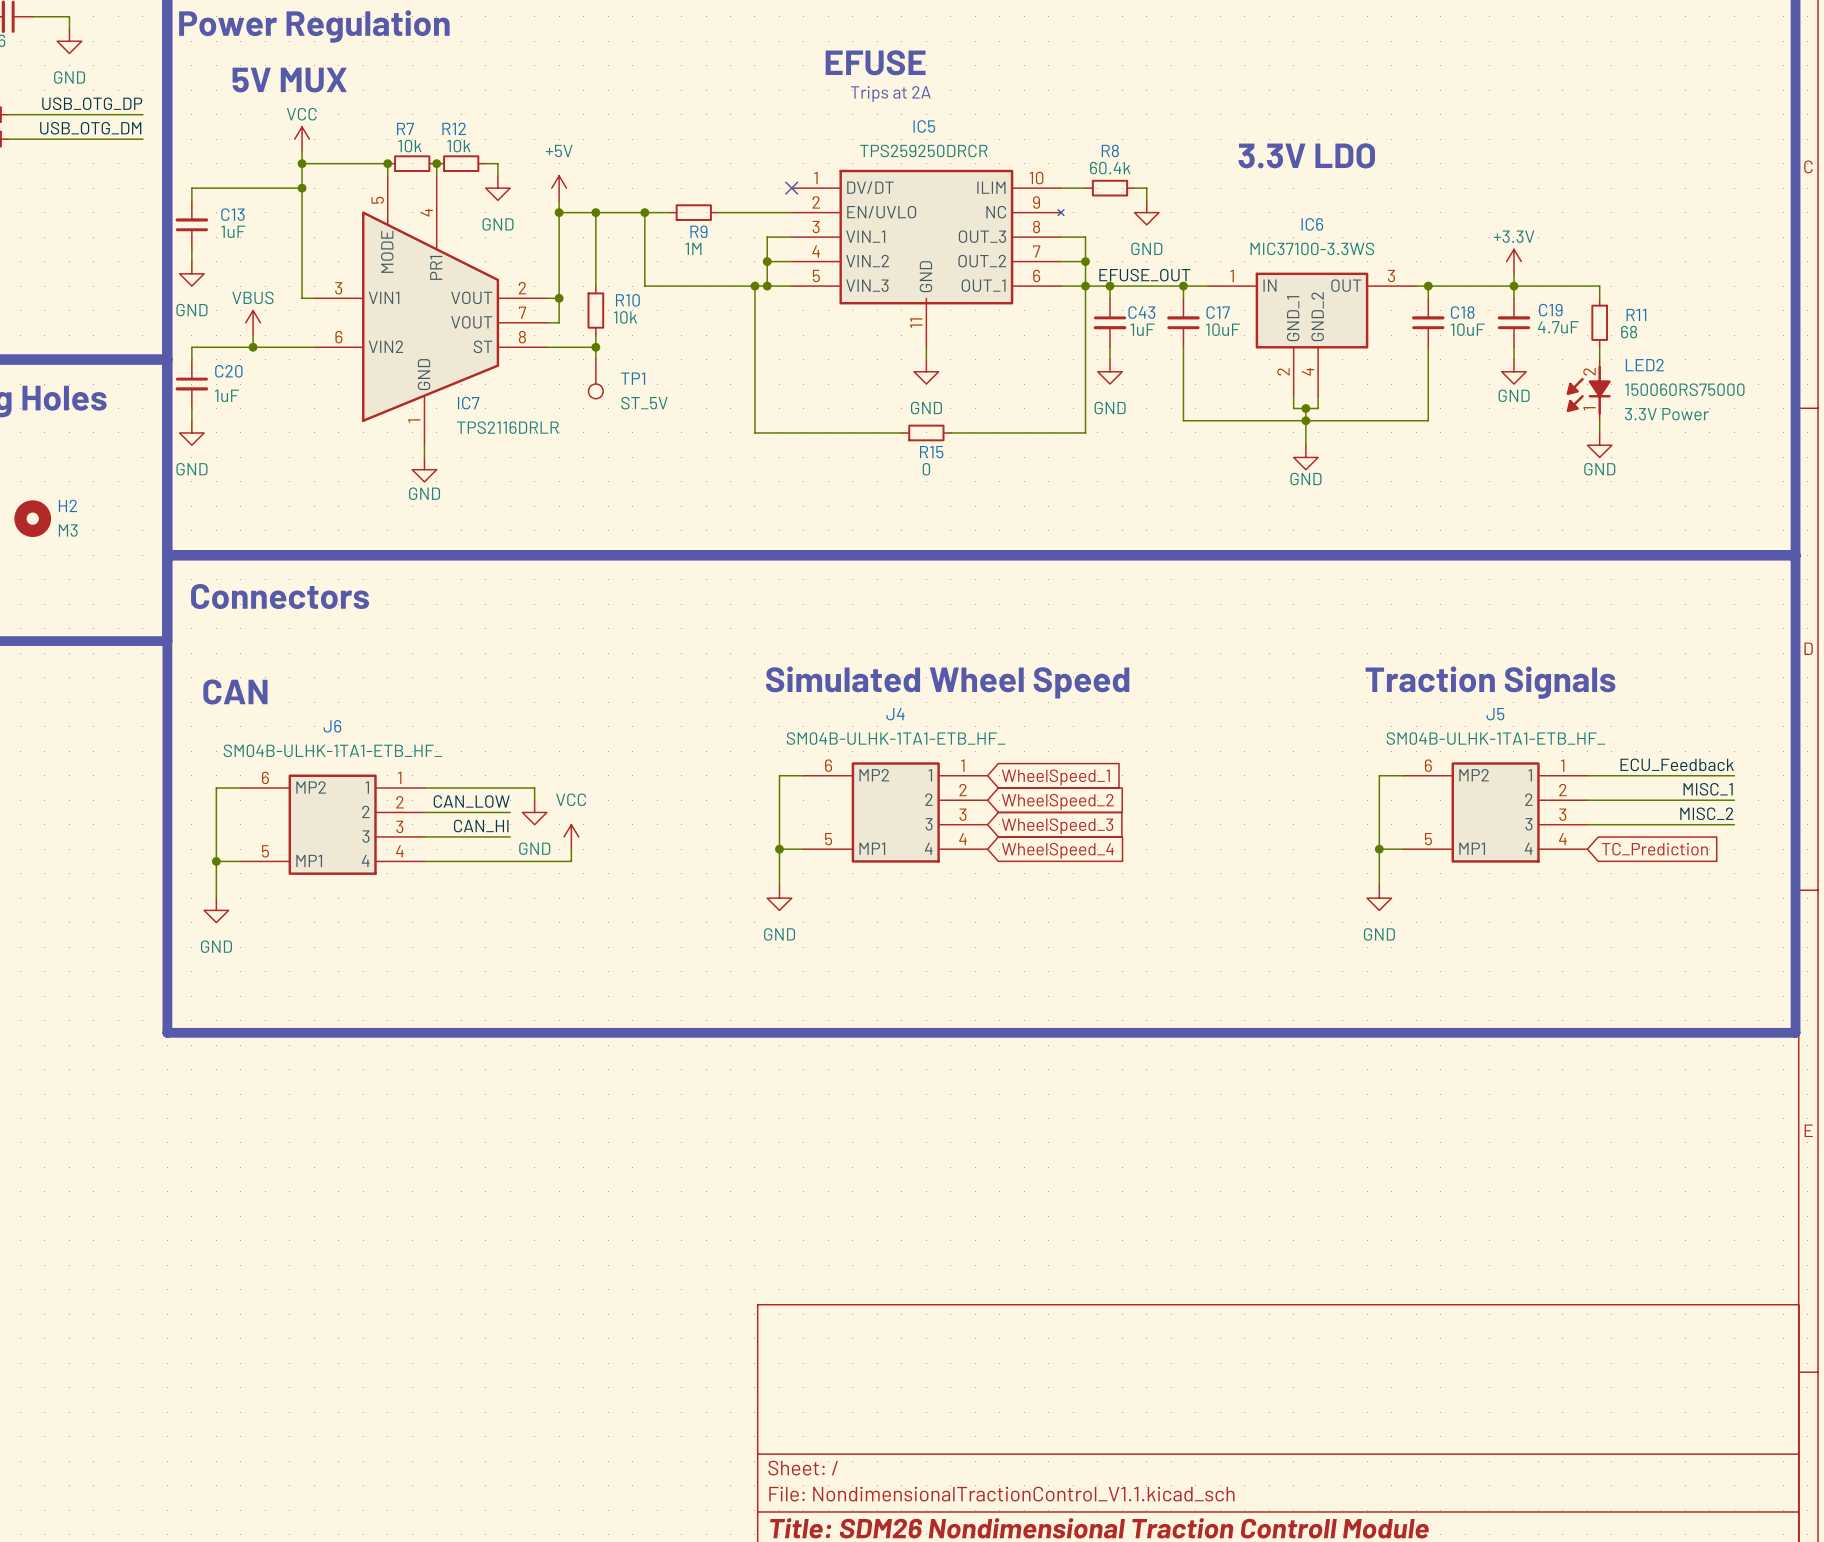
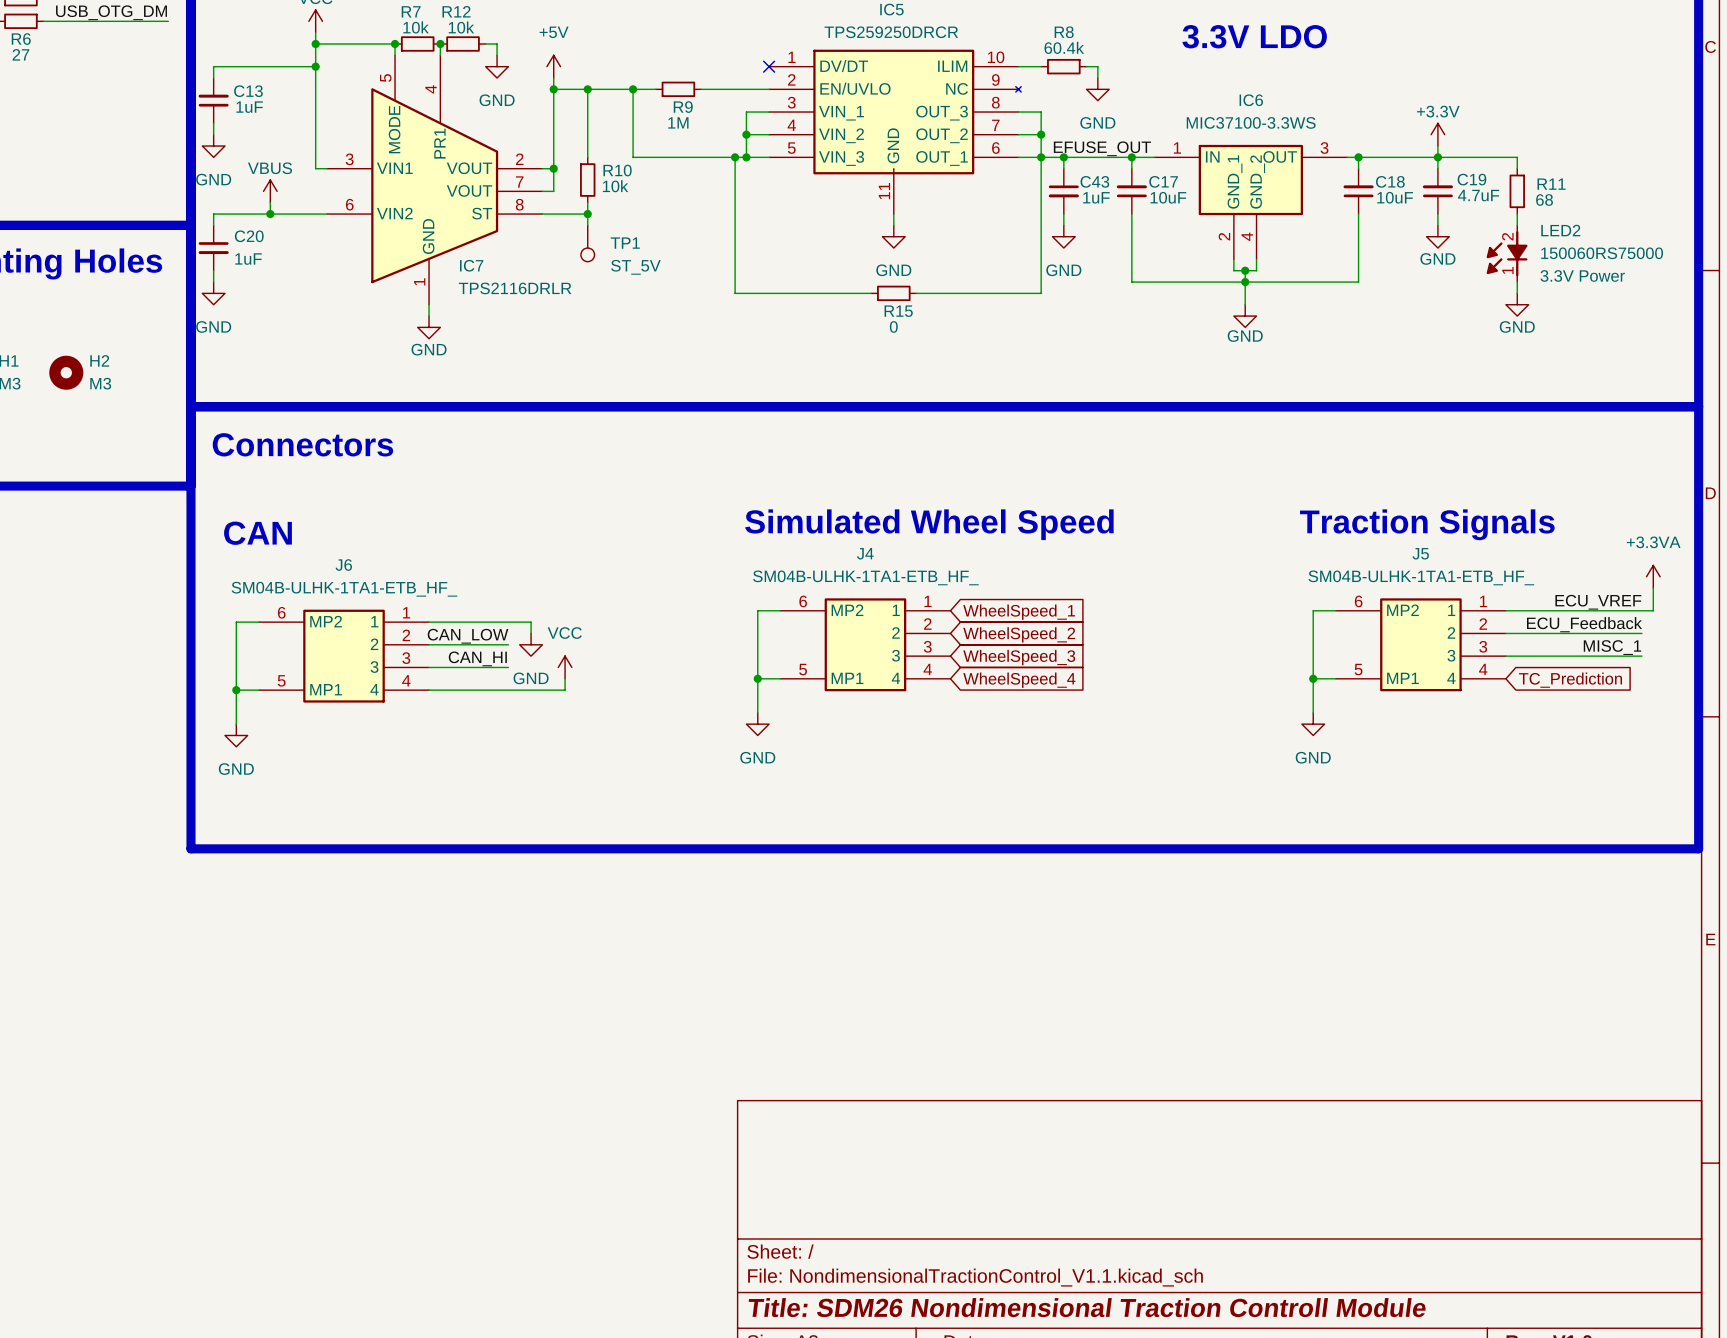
power symbol: none -> +3.3VA (1653, 576)
wire: none -> (1653, 588) (1653, 610) (1641, 610)
label: ECU_Feedback (1677, 764) -> ECU_VREF (1598, 602)
label: MISC_1 (1708, 789) -> ECU_Feedback (1584, 624)
label: MISC_2 (1706, 813) -> MISC_1 (1612, 647)

